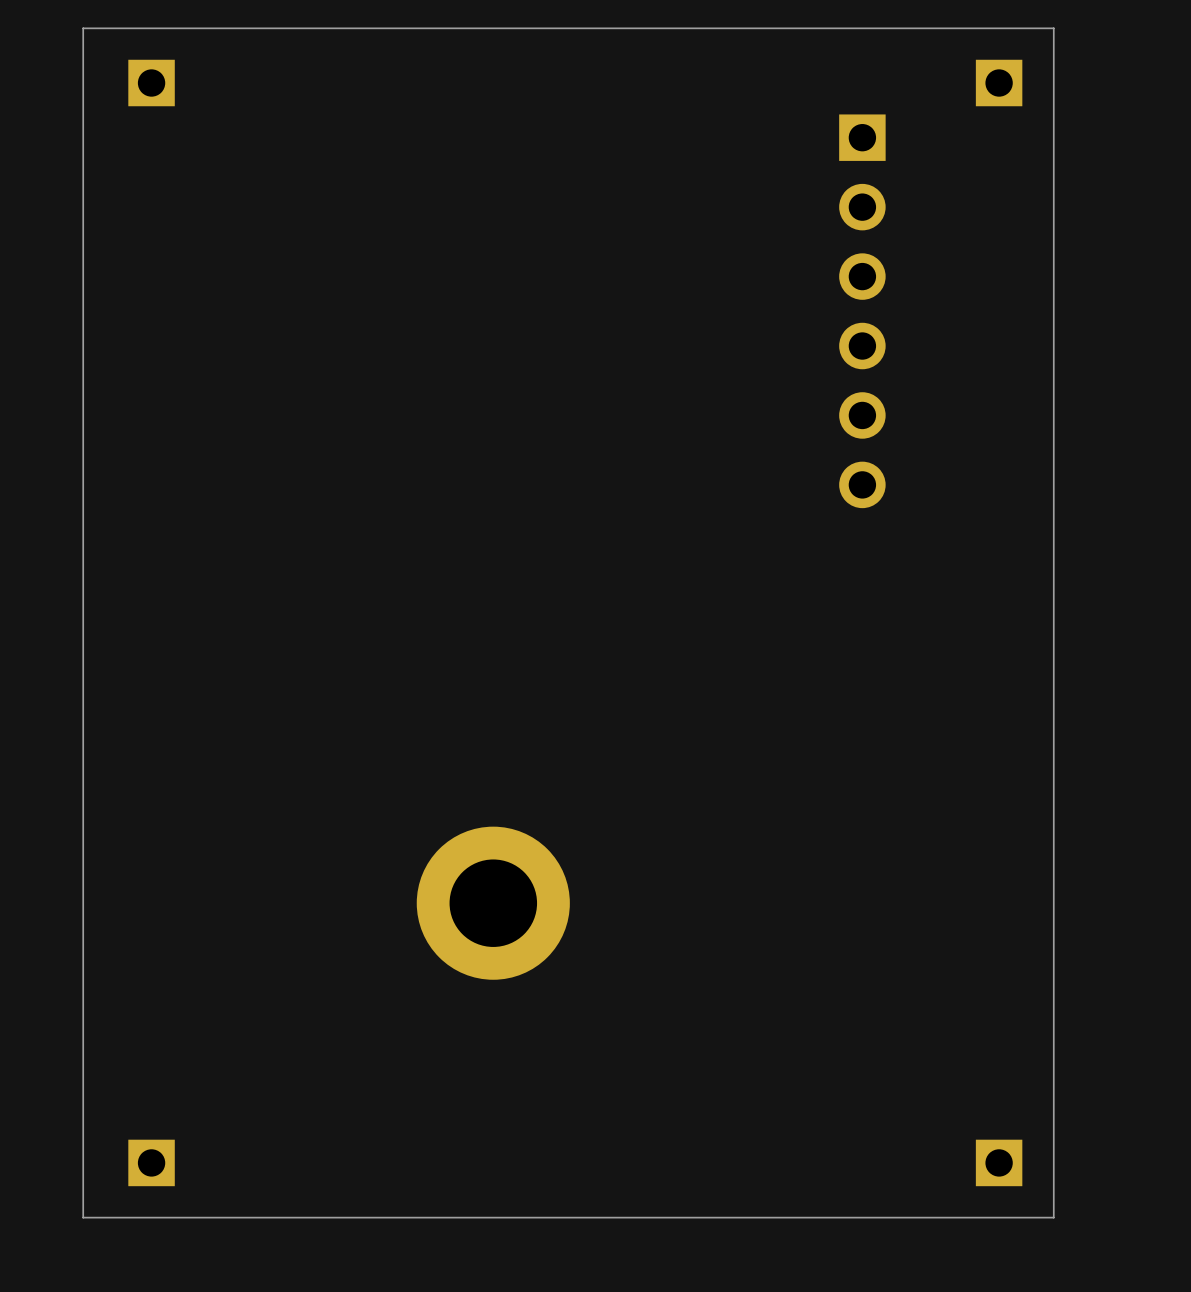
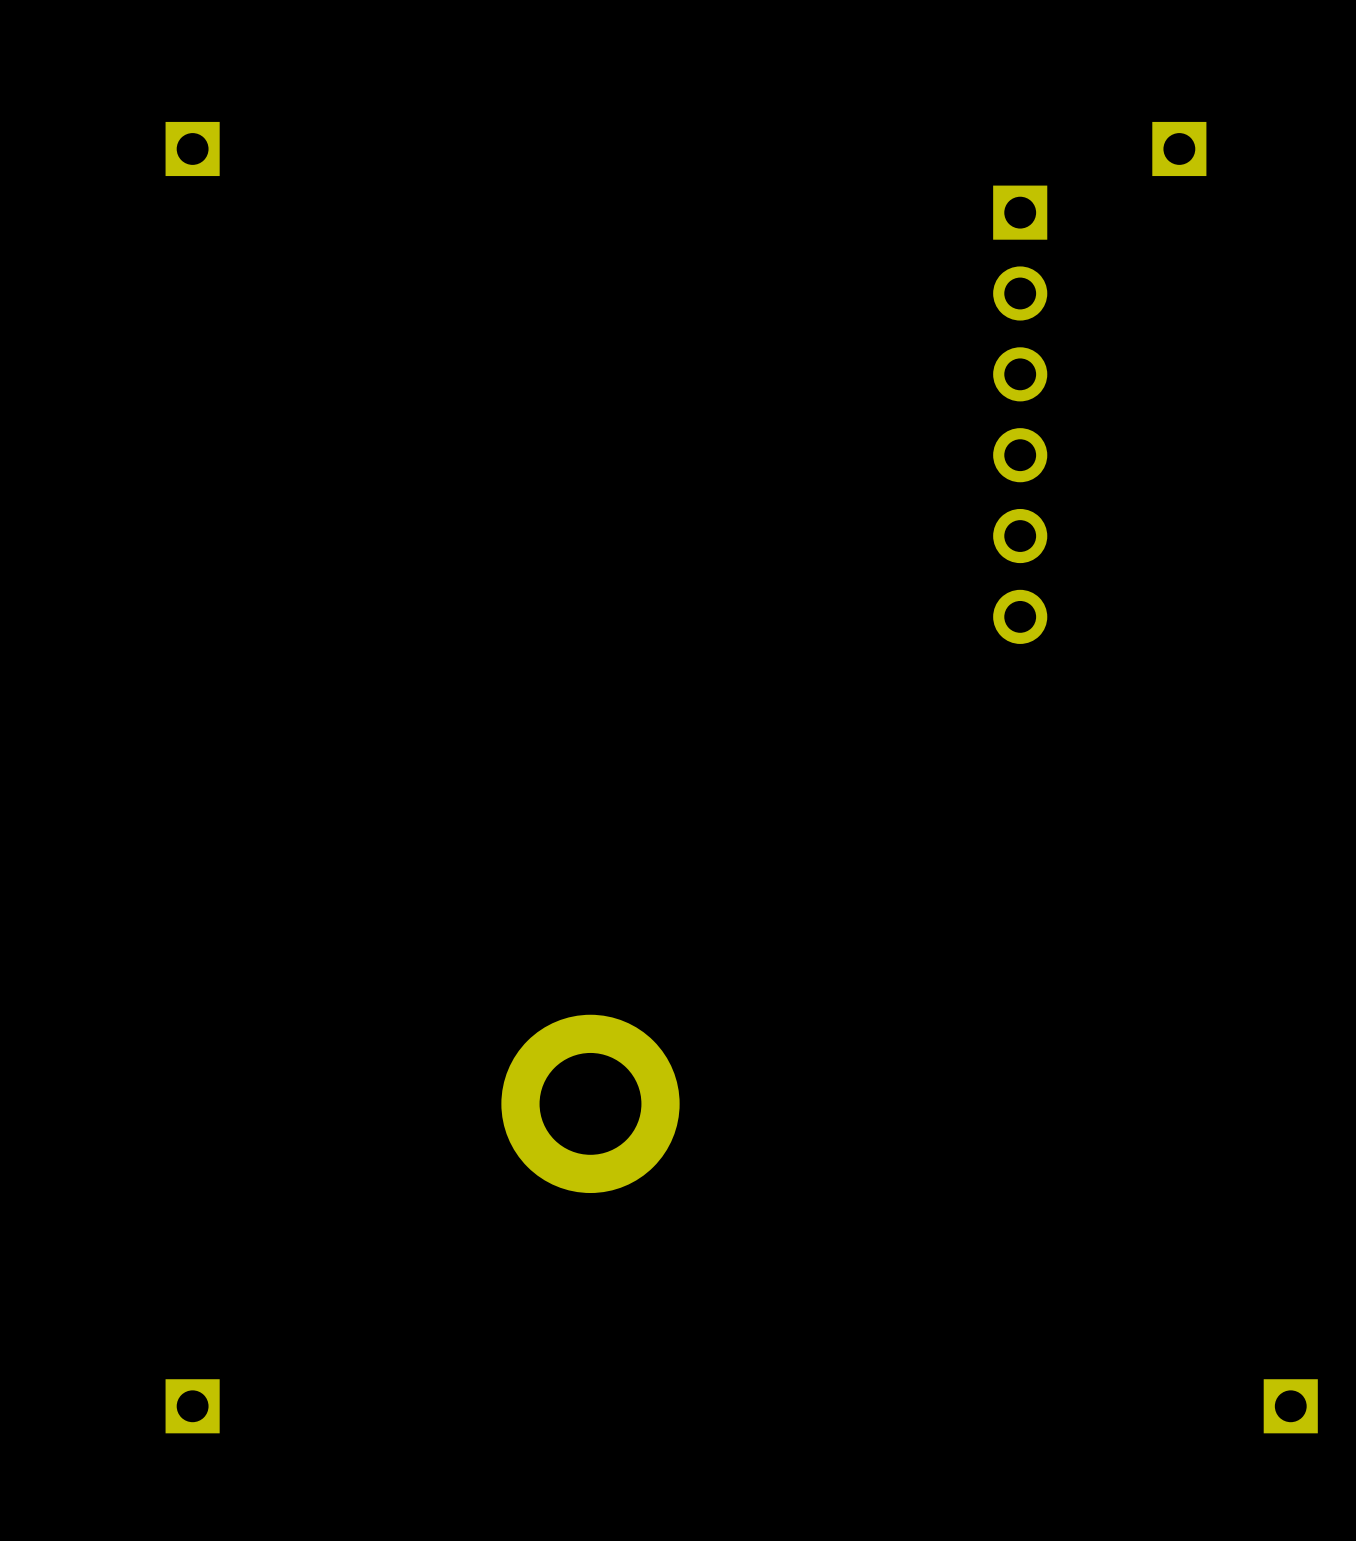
board edge: (1053, 28) (83, 28) (83, 1217) (1053, 1217) (1053, 28) -> none
part position: (999, 1162) -> (1290, 1406)

